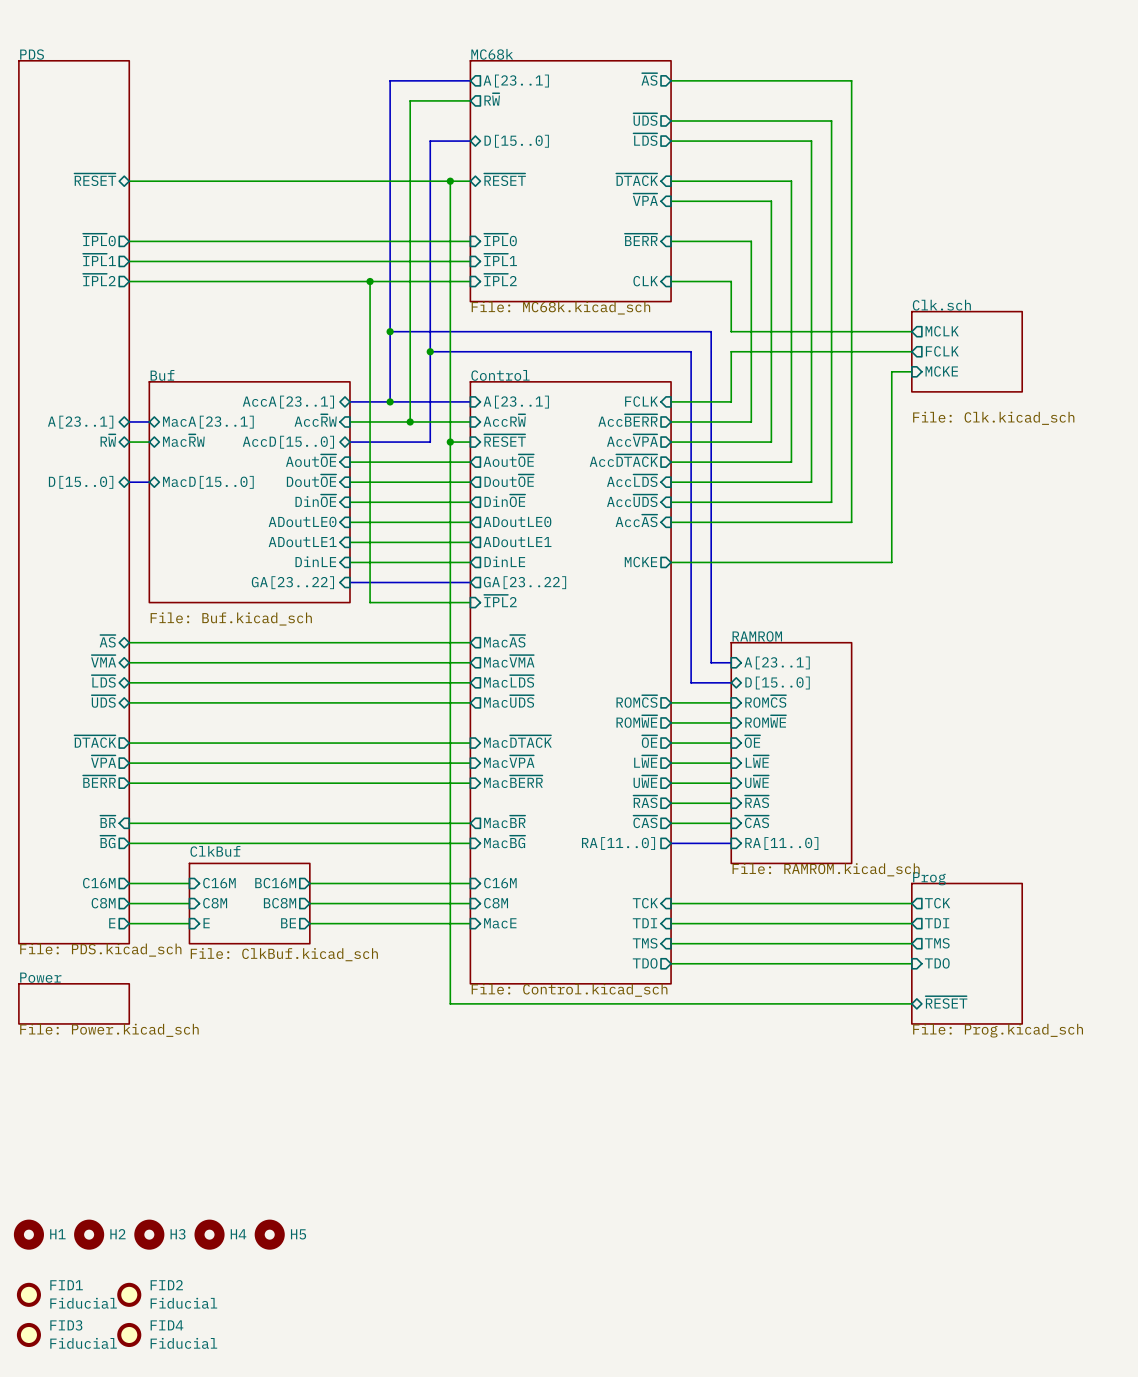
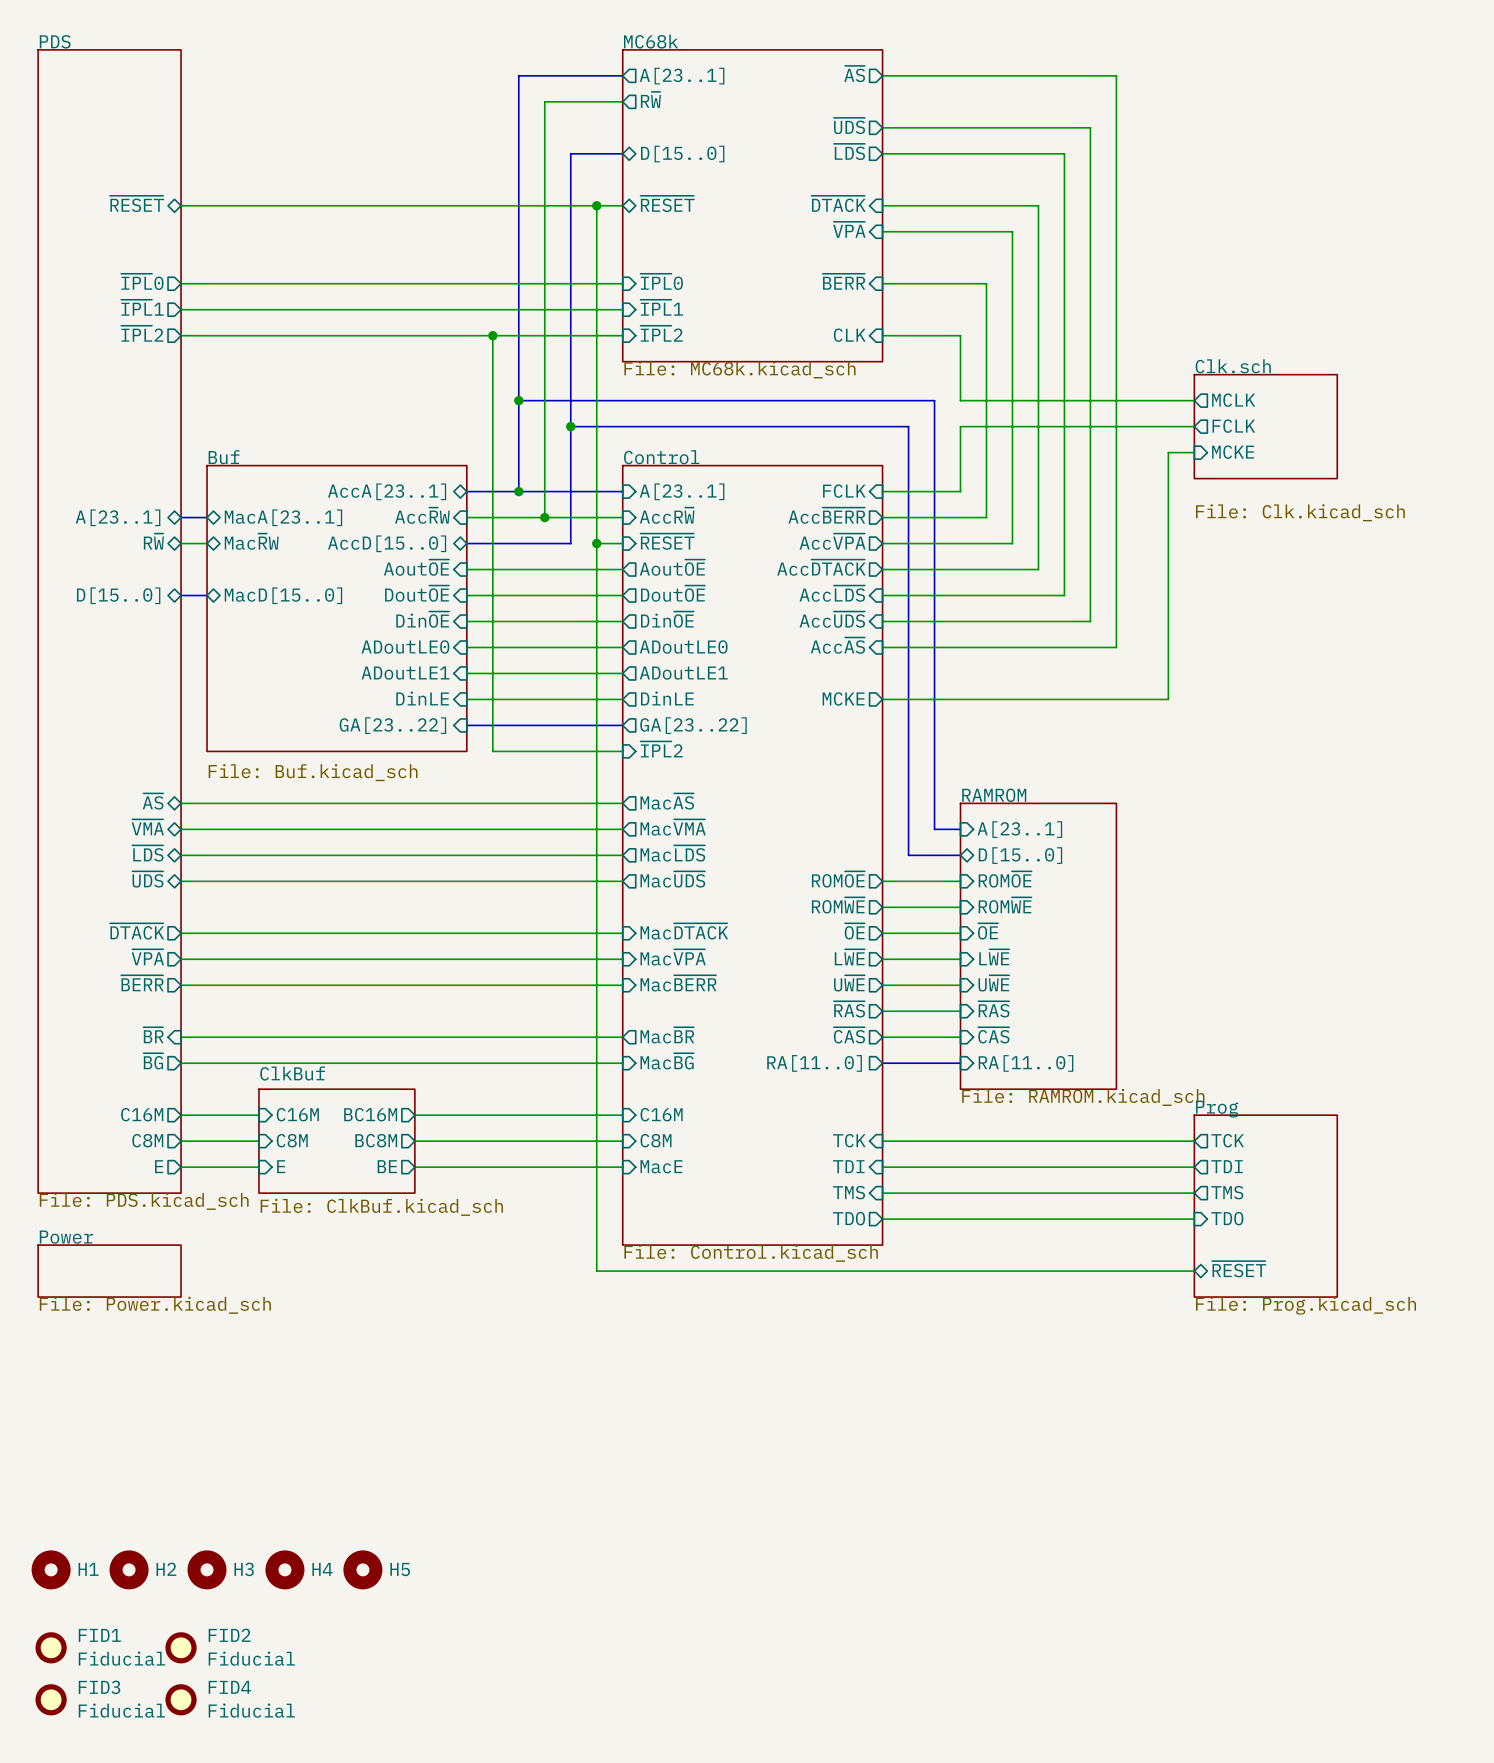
sheet pin: ROM~{CS} (636, 701) -> ROM~{OE} (838, 879)
sheet pin: ROM~{CS} (765, 701) -> ROM~{OE} (1005, 879)

